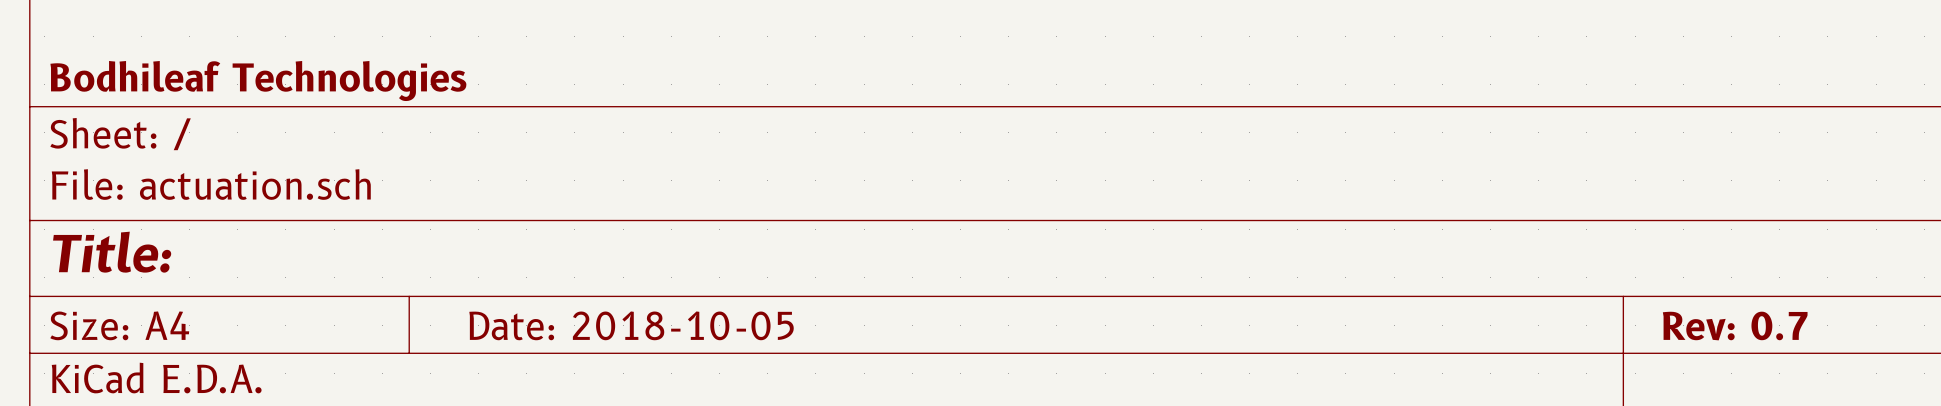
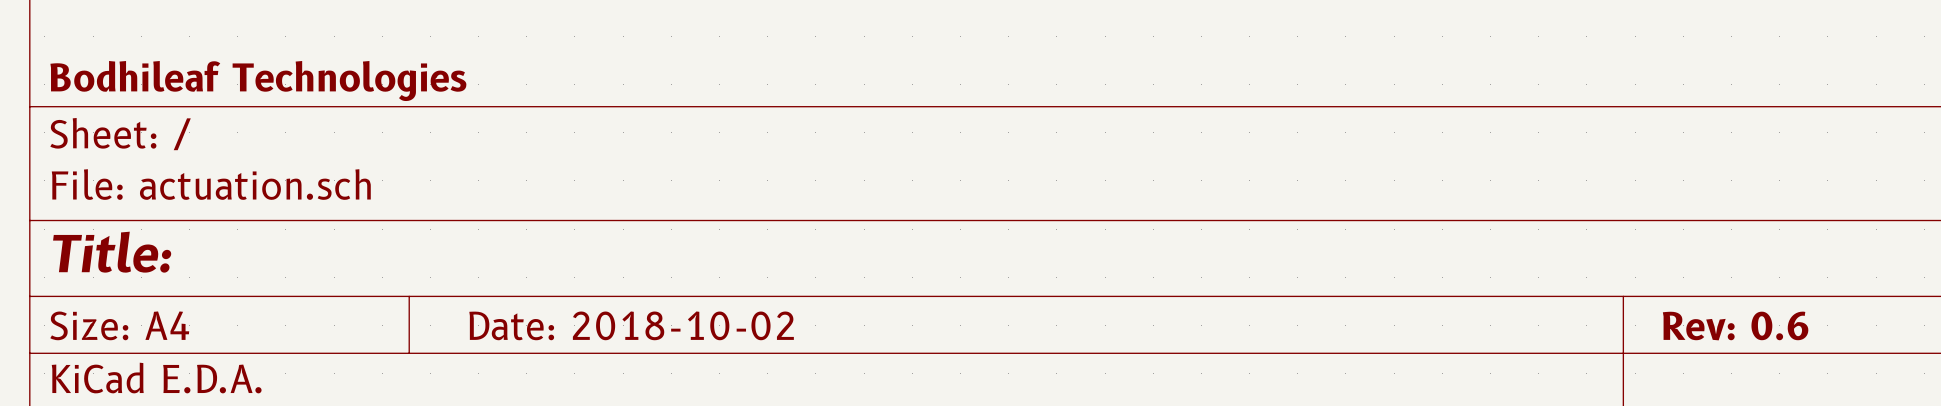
title block: Date: 2018-10-05 (631, 325) -> Date: 2018-10-02 (631, 325)
title block: Rev: 0.7 (1735, 326) -> Rev: 0.6 (1735, 326)

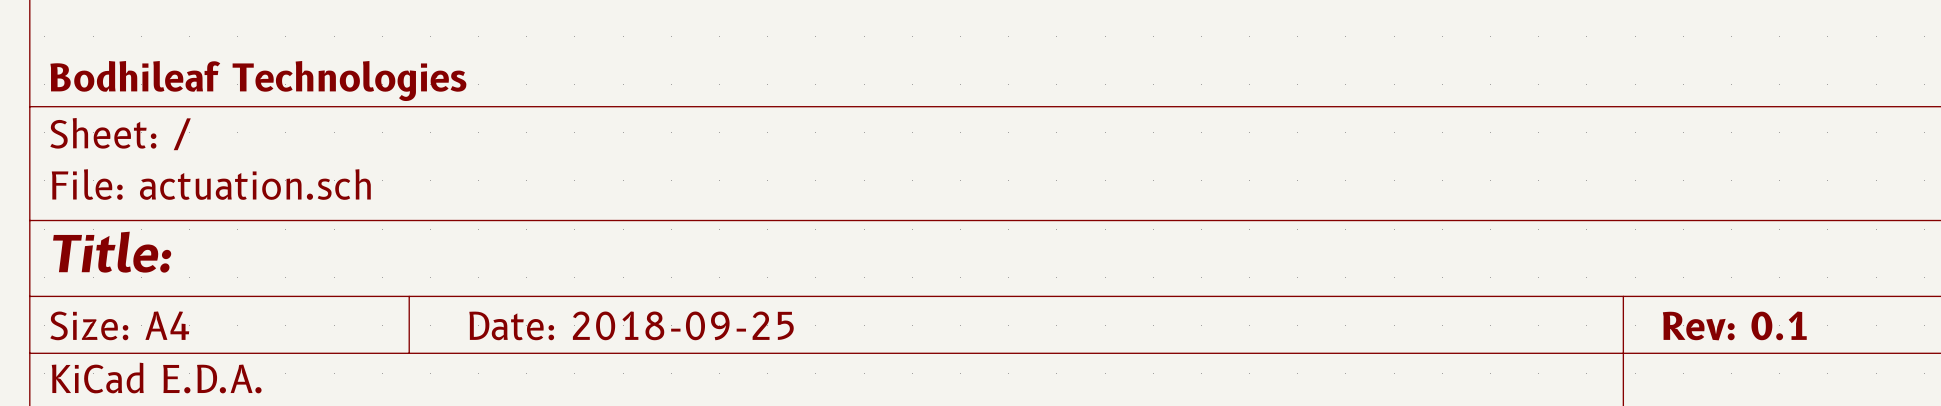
title block: Date: 2018-10-02 (631, 325) -> Date: 2018-09-25 (631, 325)
title block: Rev: 0.6 (1735, 326) -> Rev: 0.1 (1734, 325)

